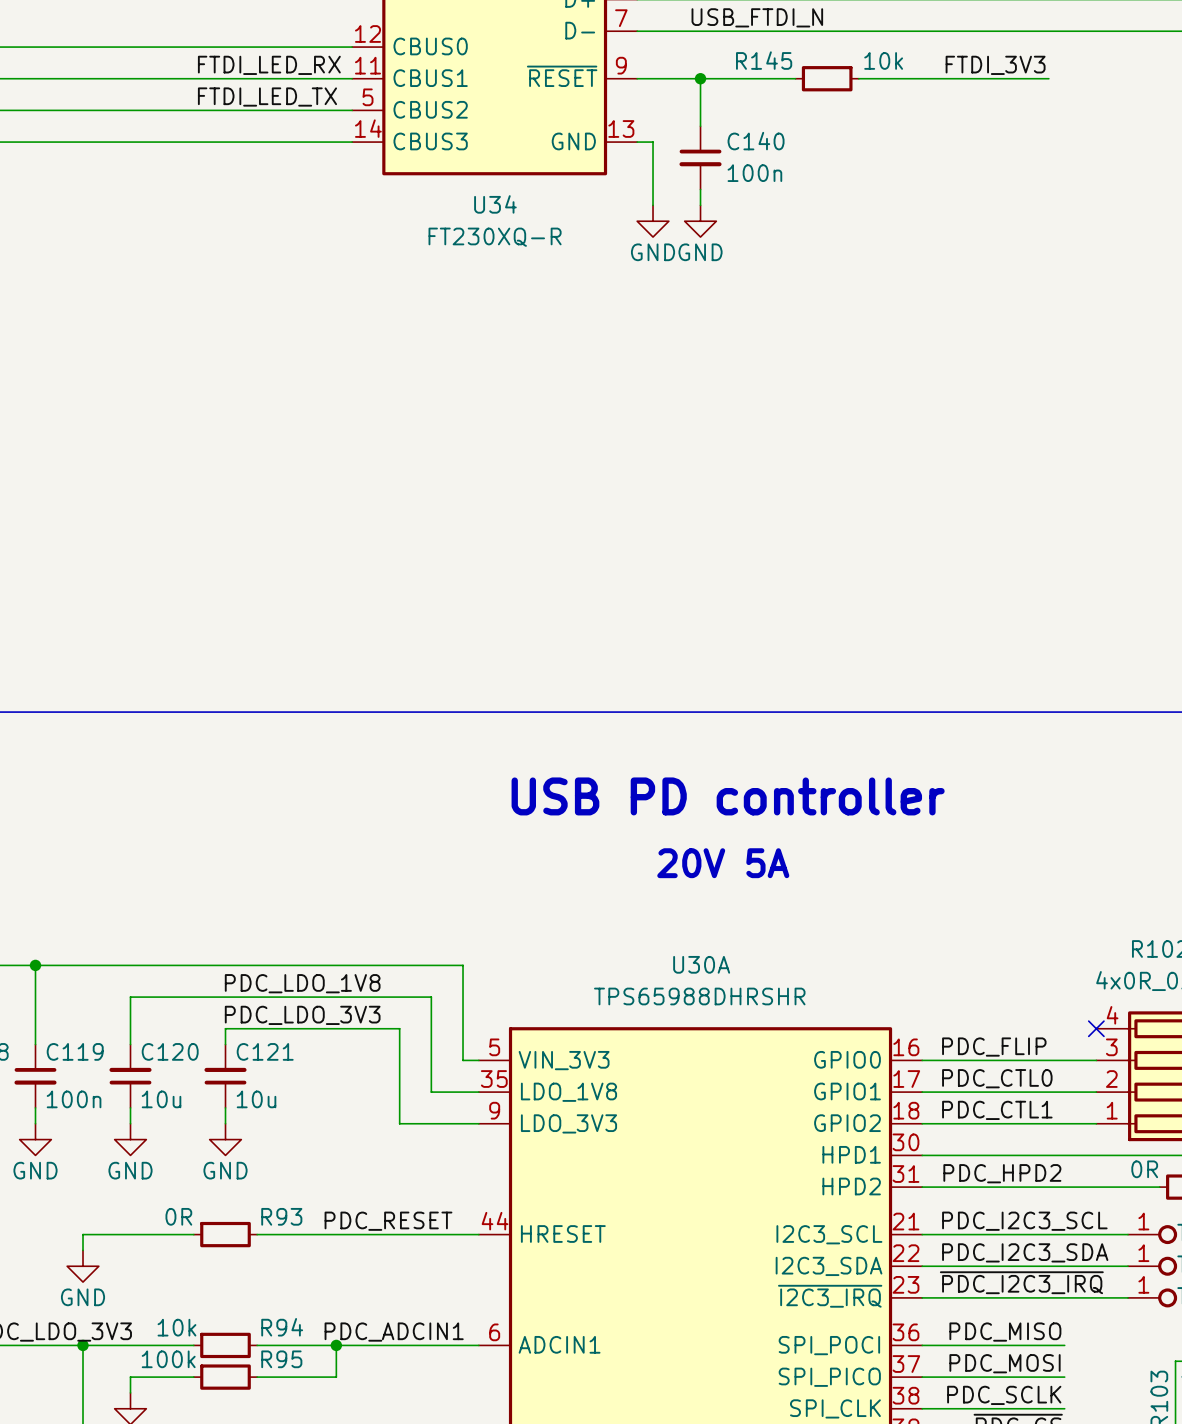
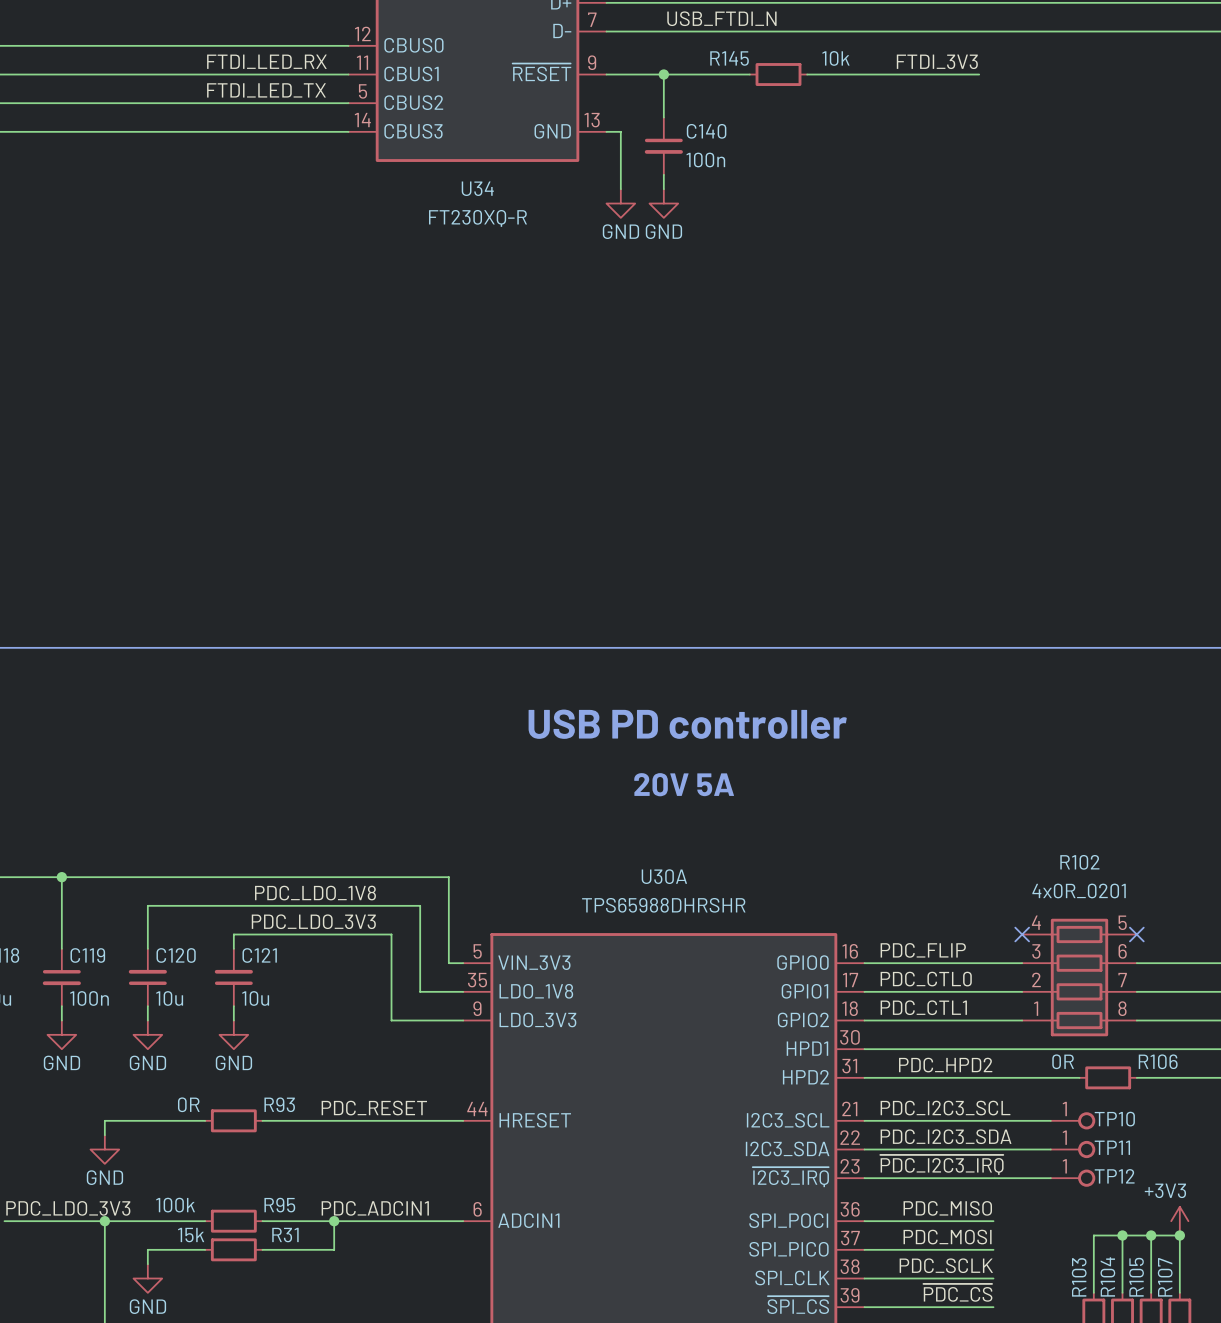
R94 text: 10k (176, 1327) -> 100k (175, 1205)
R94 name: R94 (282, 1327) -> R95 (279, 1205)
R95 text: 100k (168, 1359) -> 15k (191, 1235)
R95 name: R95 (281, 1359) -> R31 (285, 1235)

